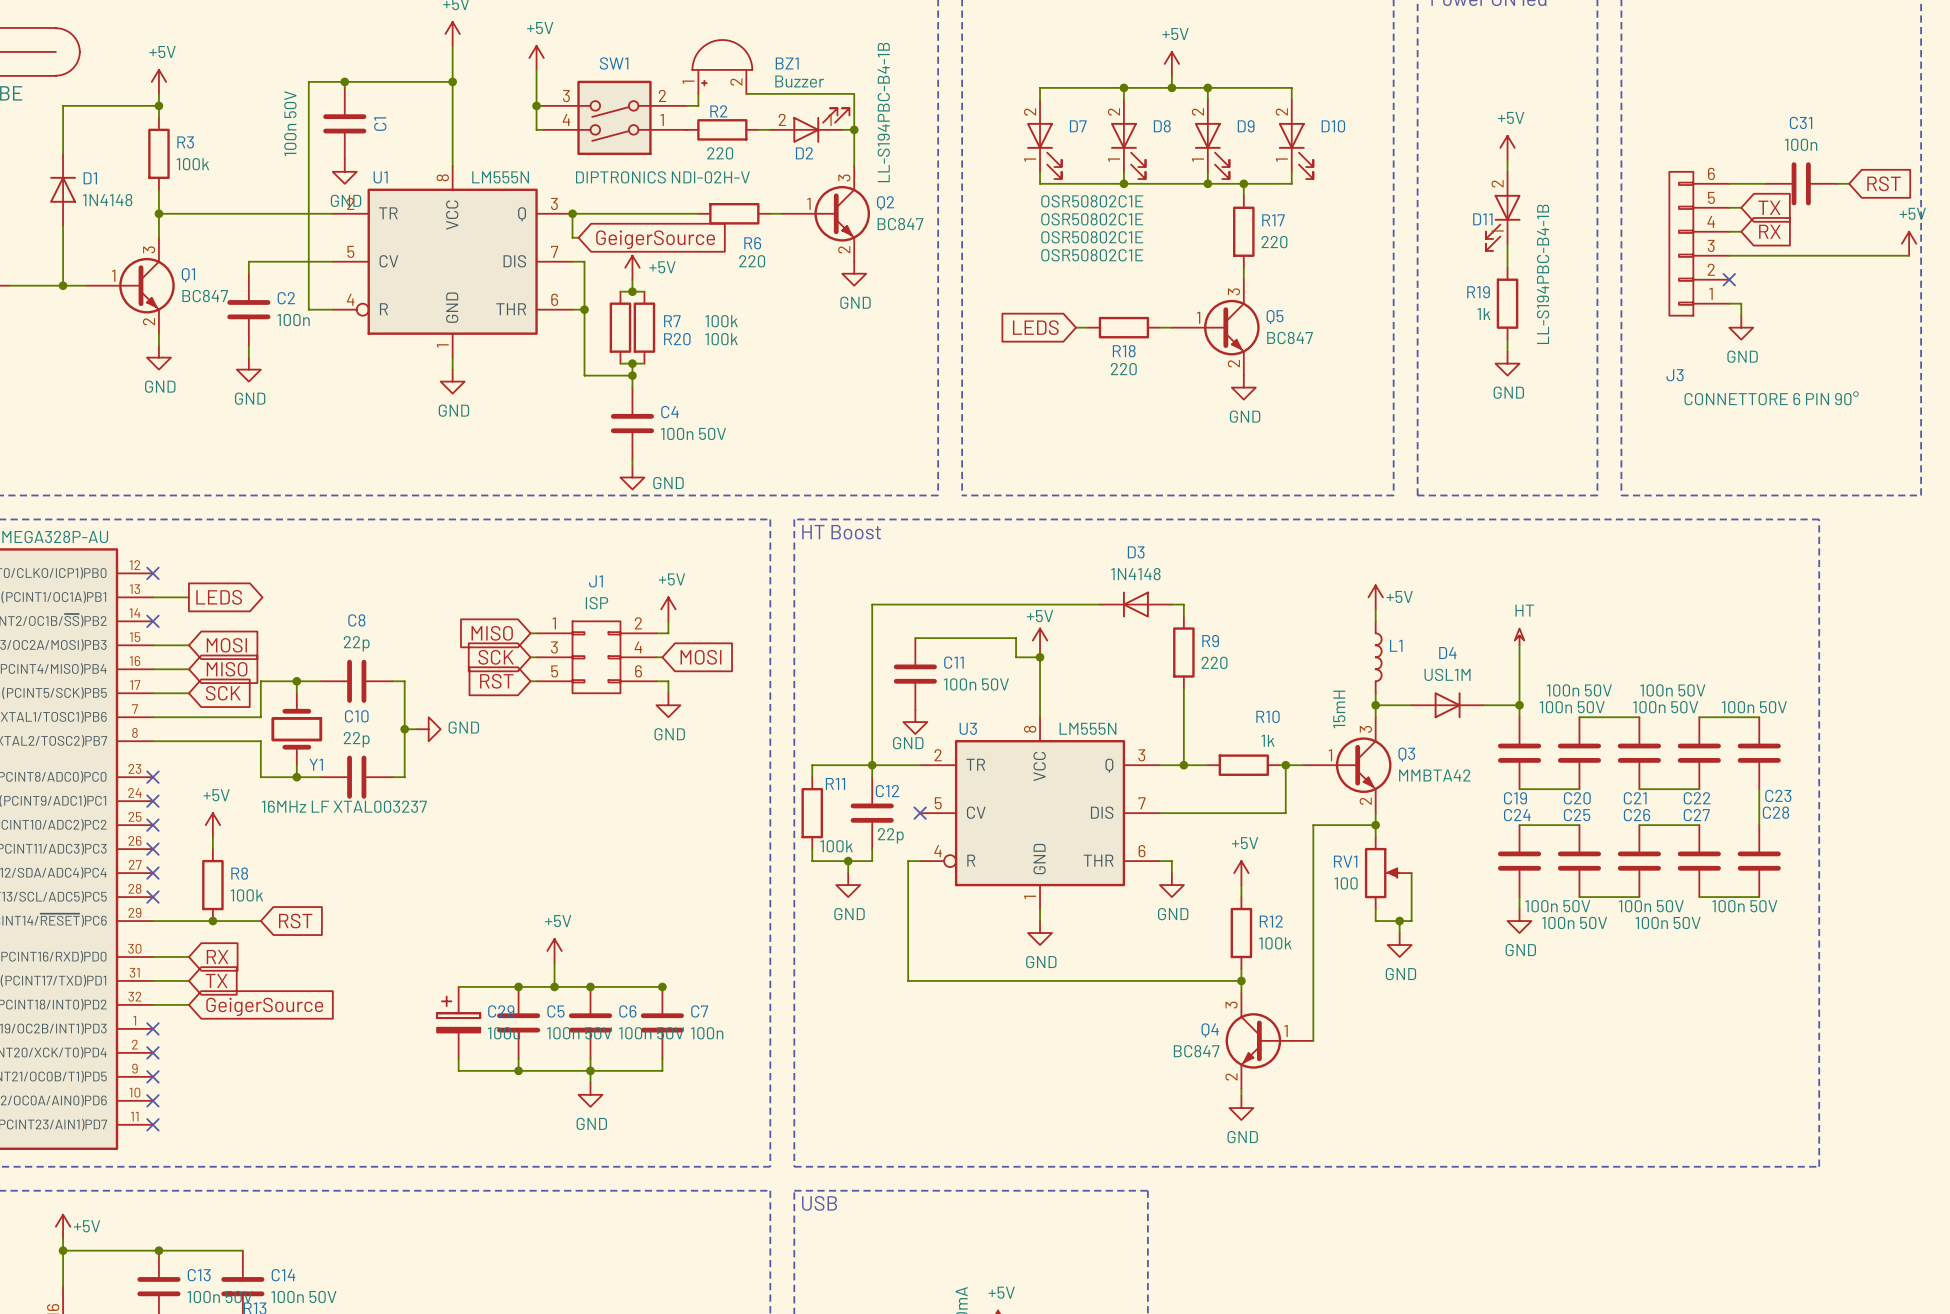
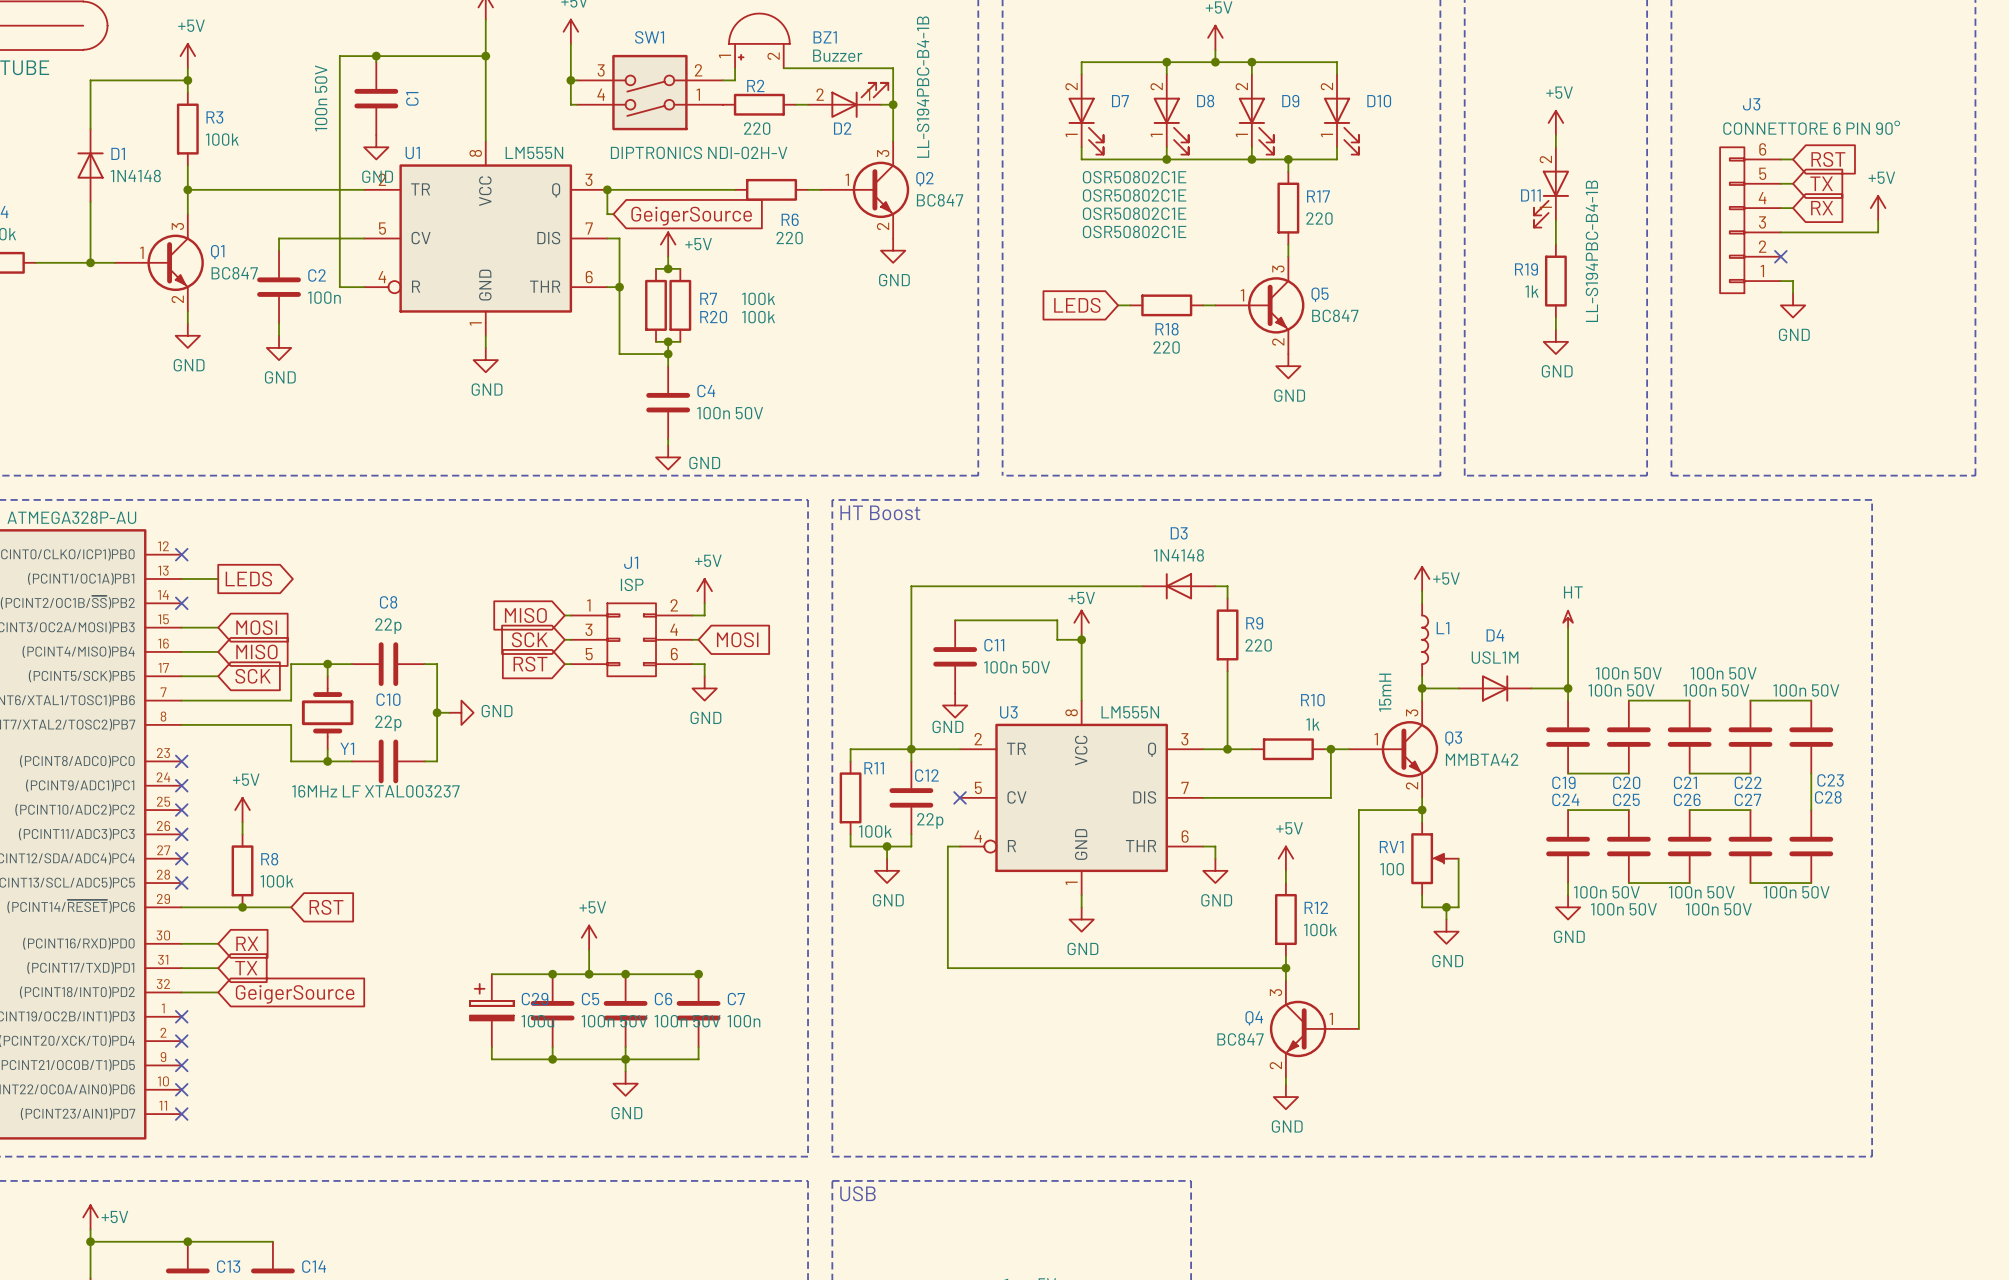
wire: (1741, 183) (1765, 183) -> none
C31: 100n (1801, 183) -> none
wire: (1837, 183) (1849, 183) -> none
global label position: RST (1884, 183) -> RST (1828, 159)
power symbol position: +5V (1909, 243) -> +5V (1878, 208)
wire: (1825, 255) (1909, 255) -> (1878, 232) (1878, 220)
J3 name position: J3 (1675, 375) -> J3 (1751, 104)
J3 value position: CONNETTORE 6 PIN 90° (1771, 398) -> CONNETTORE 6 PIN 90° (1811, 127)

